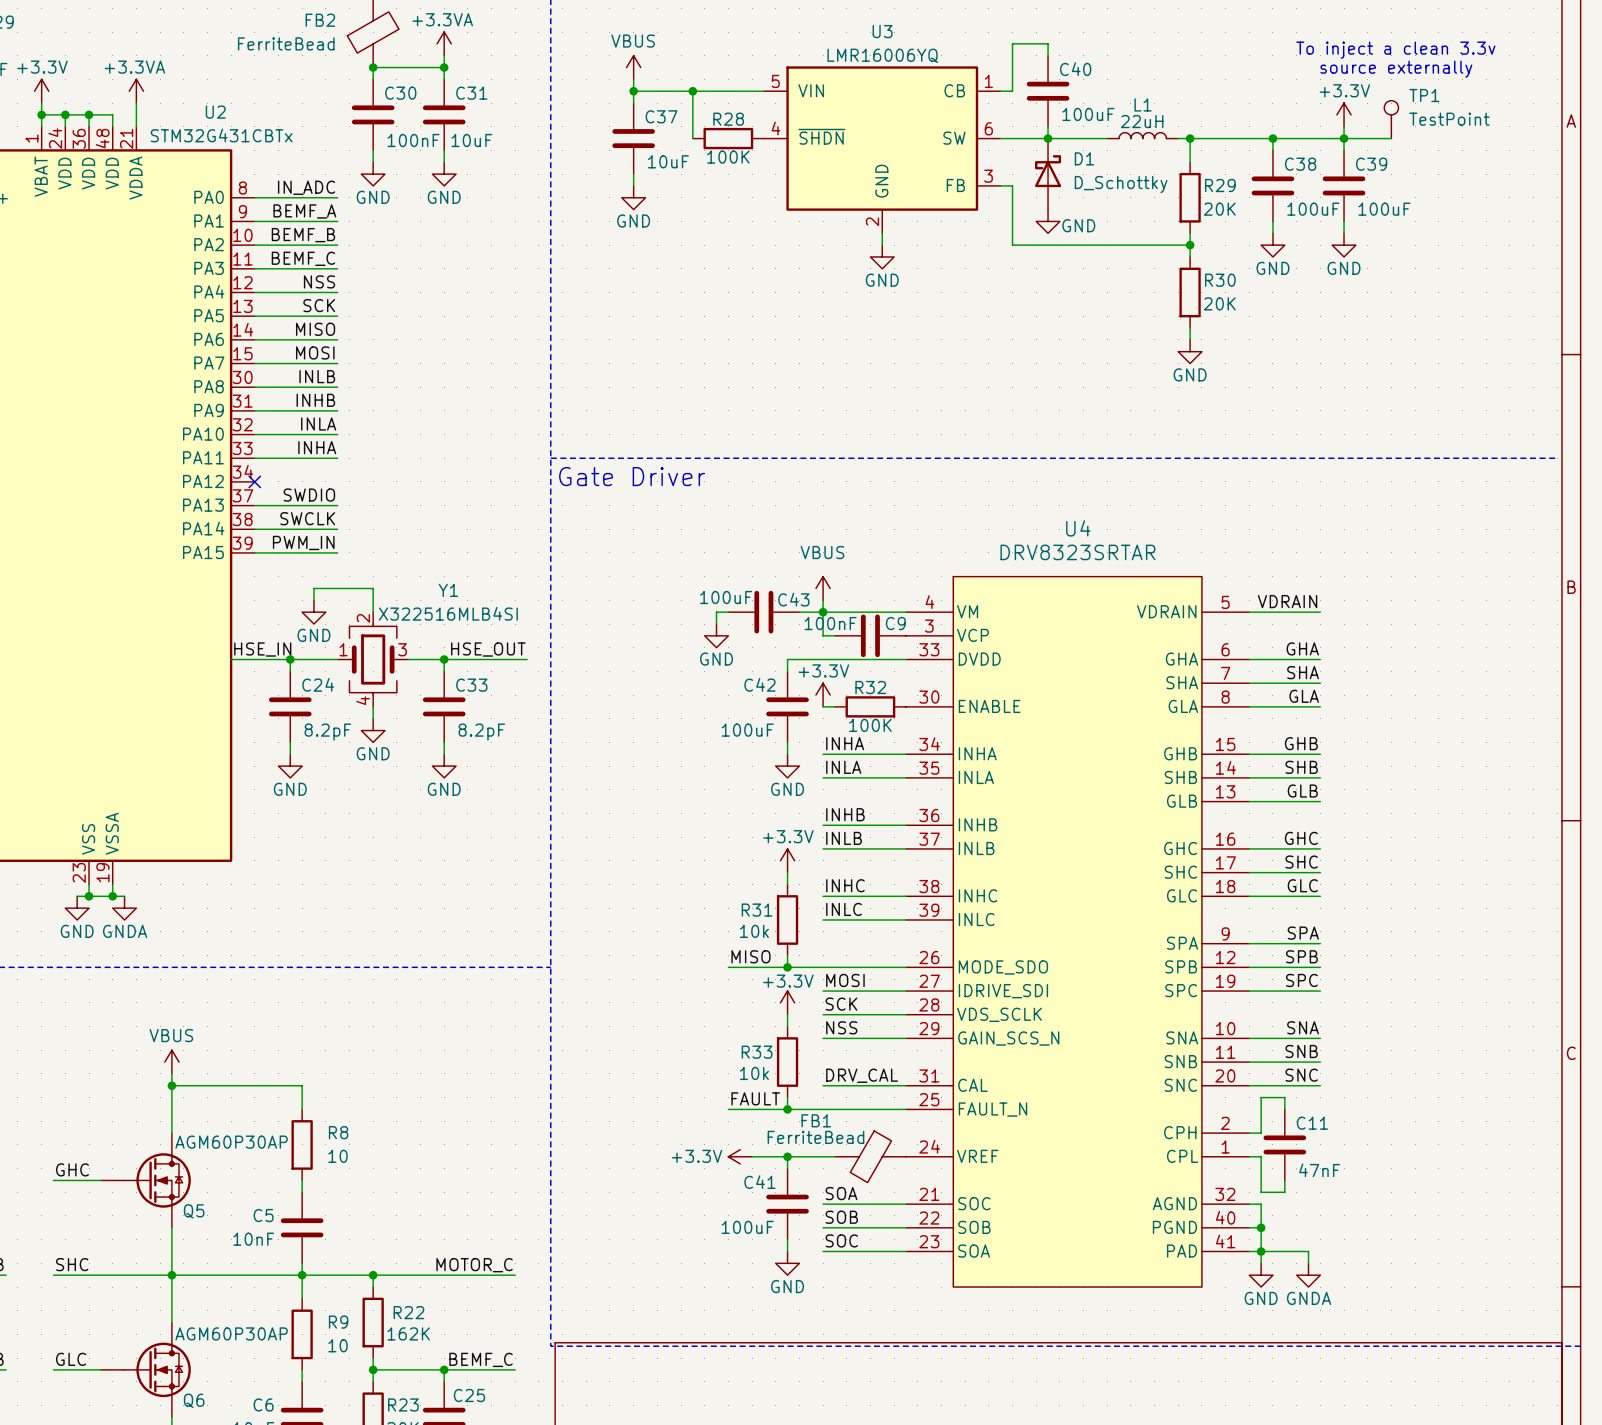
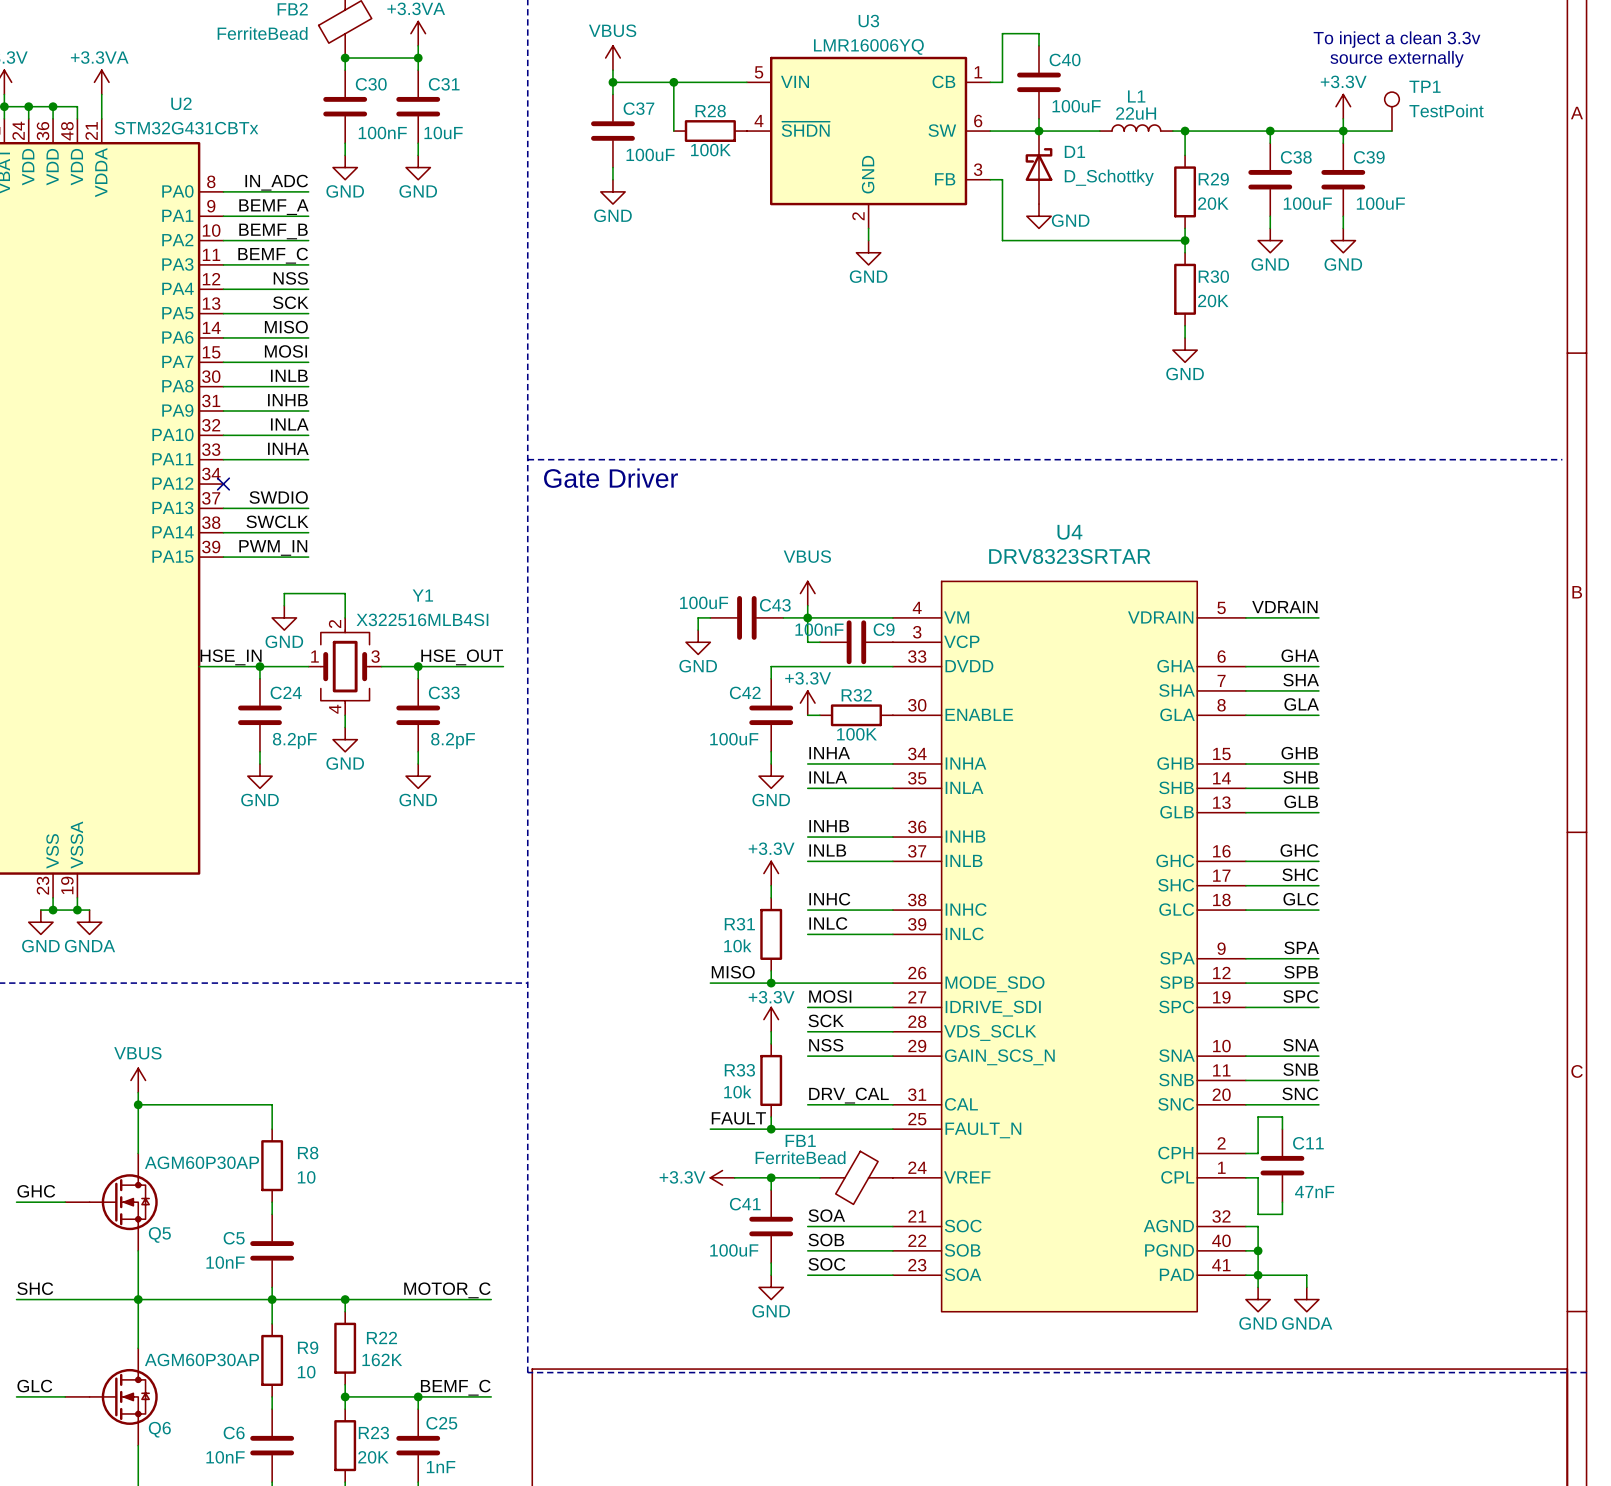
C37 value: 10uF (668, 161) -> 100uF (650, 154)

